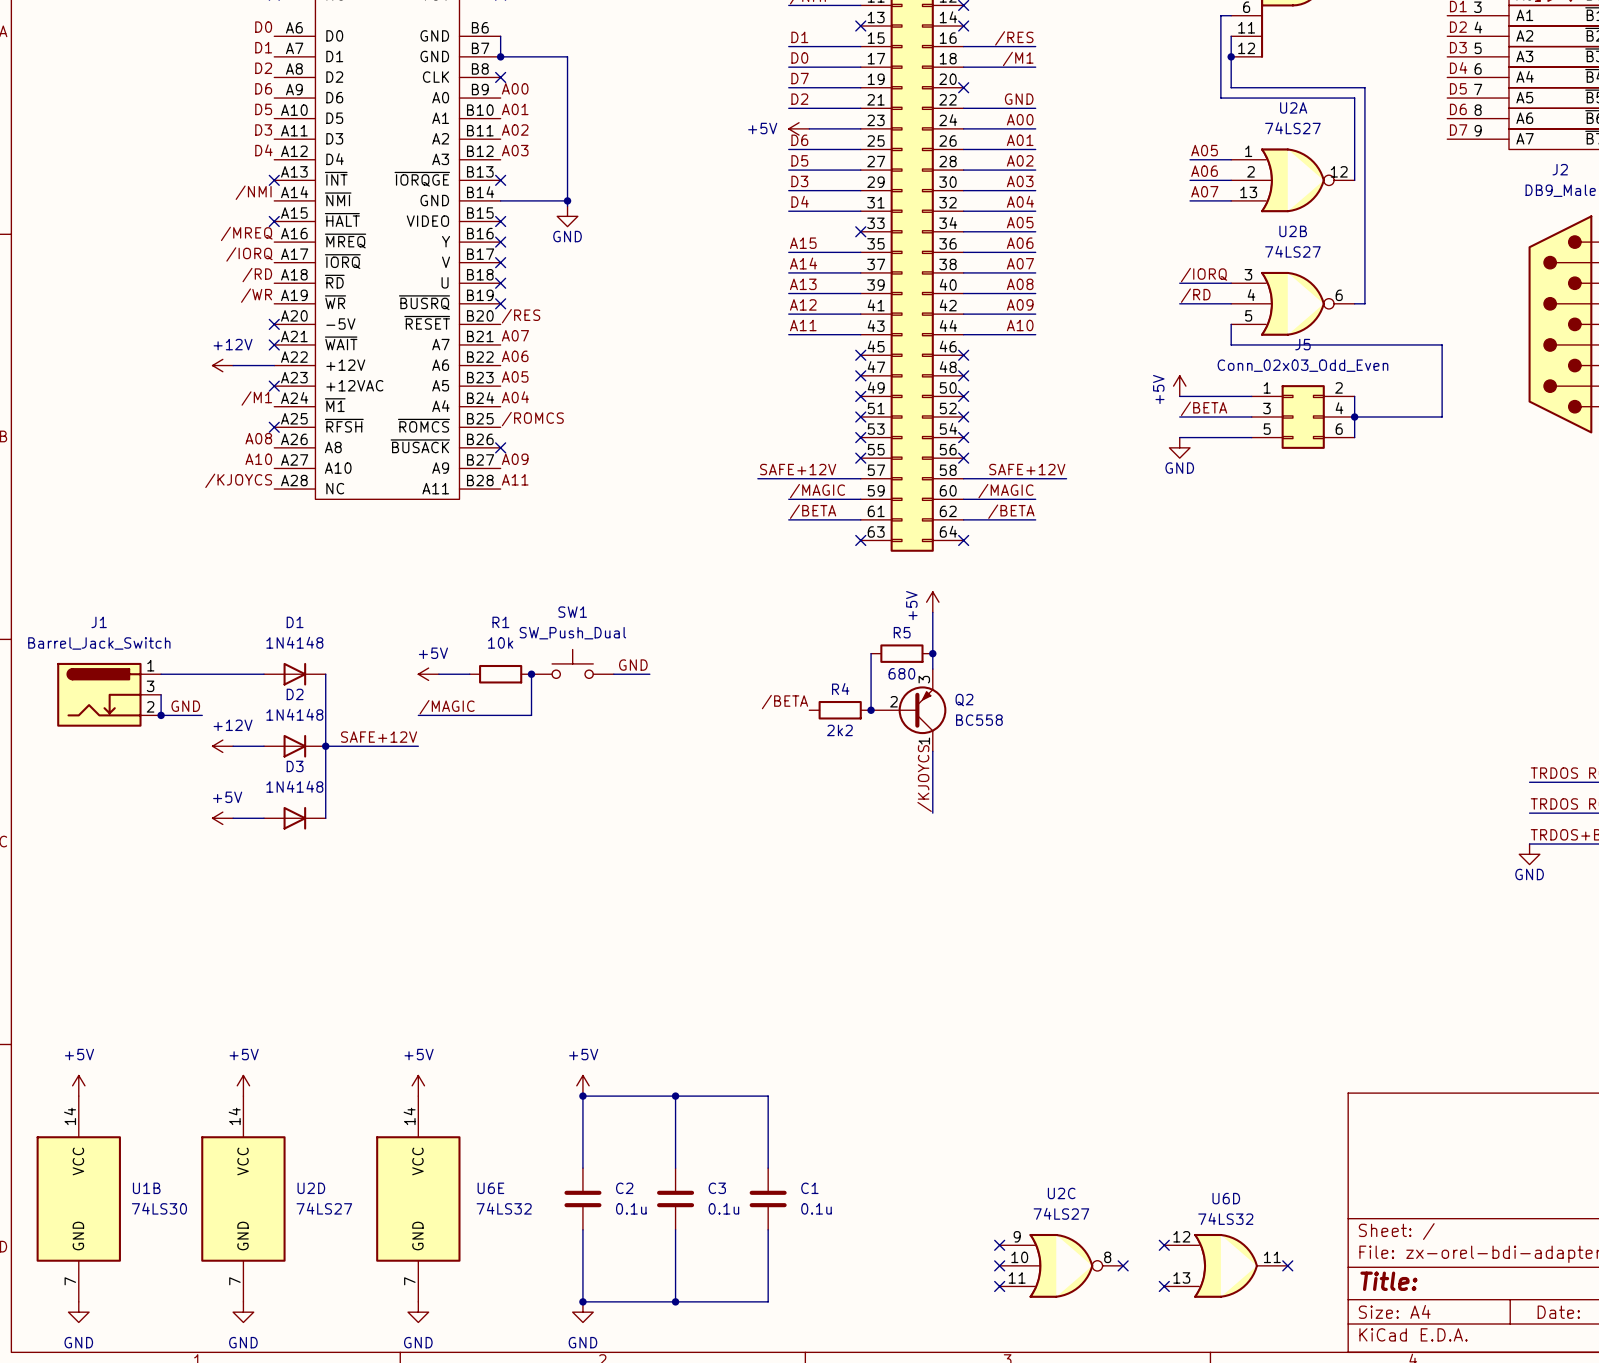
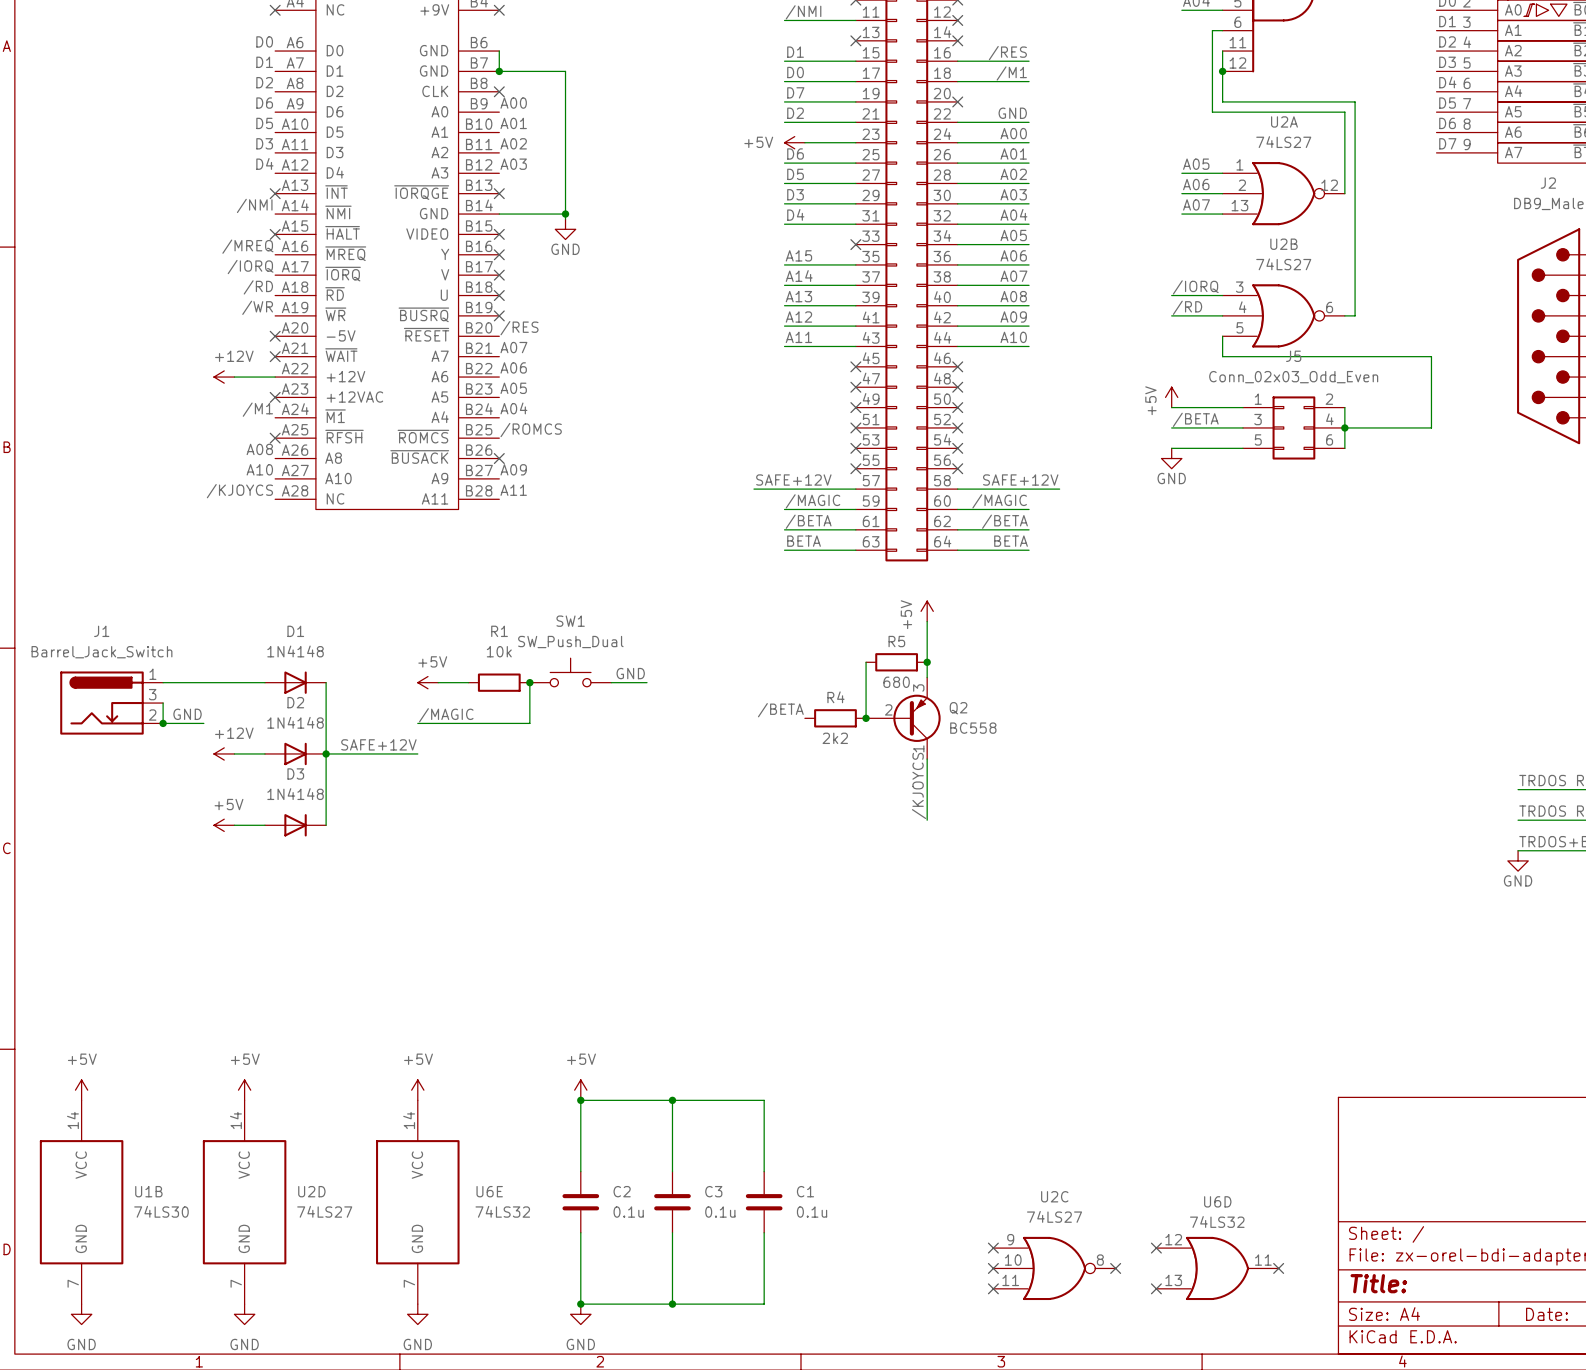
label: none -> BETA (804, 541)
label: none -> BETA (1011, 541)
wire: none -> (784, 550) (855, 550)
no-connect mark: (860, 540) -> none
wire: none -> (957, 550) (1029, 550)
no-connect mark: (963, 540) -> none

